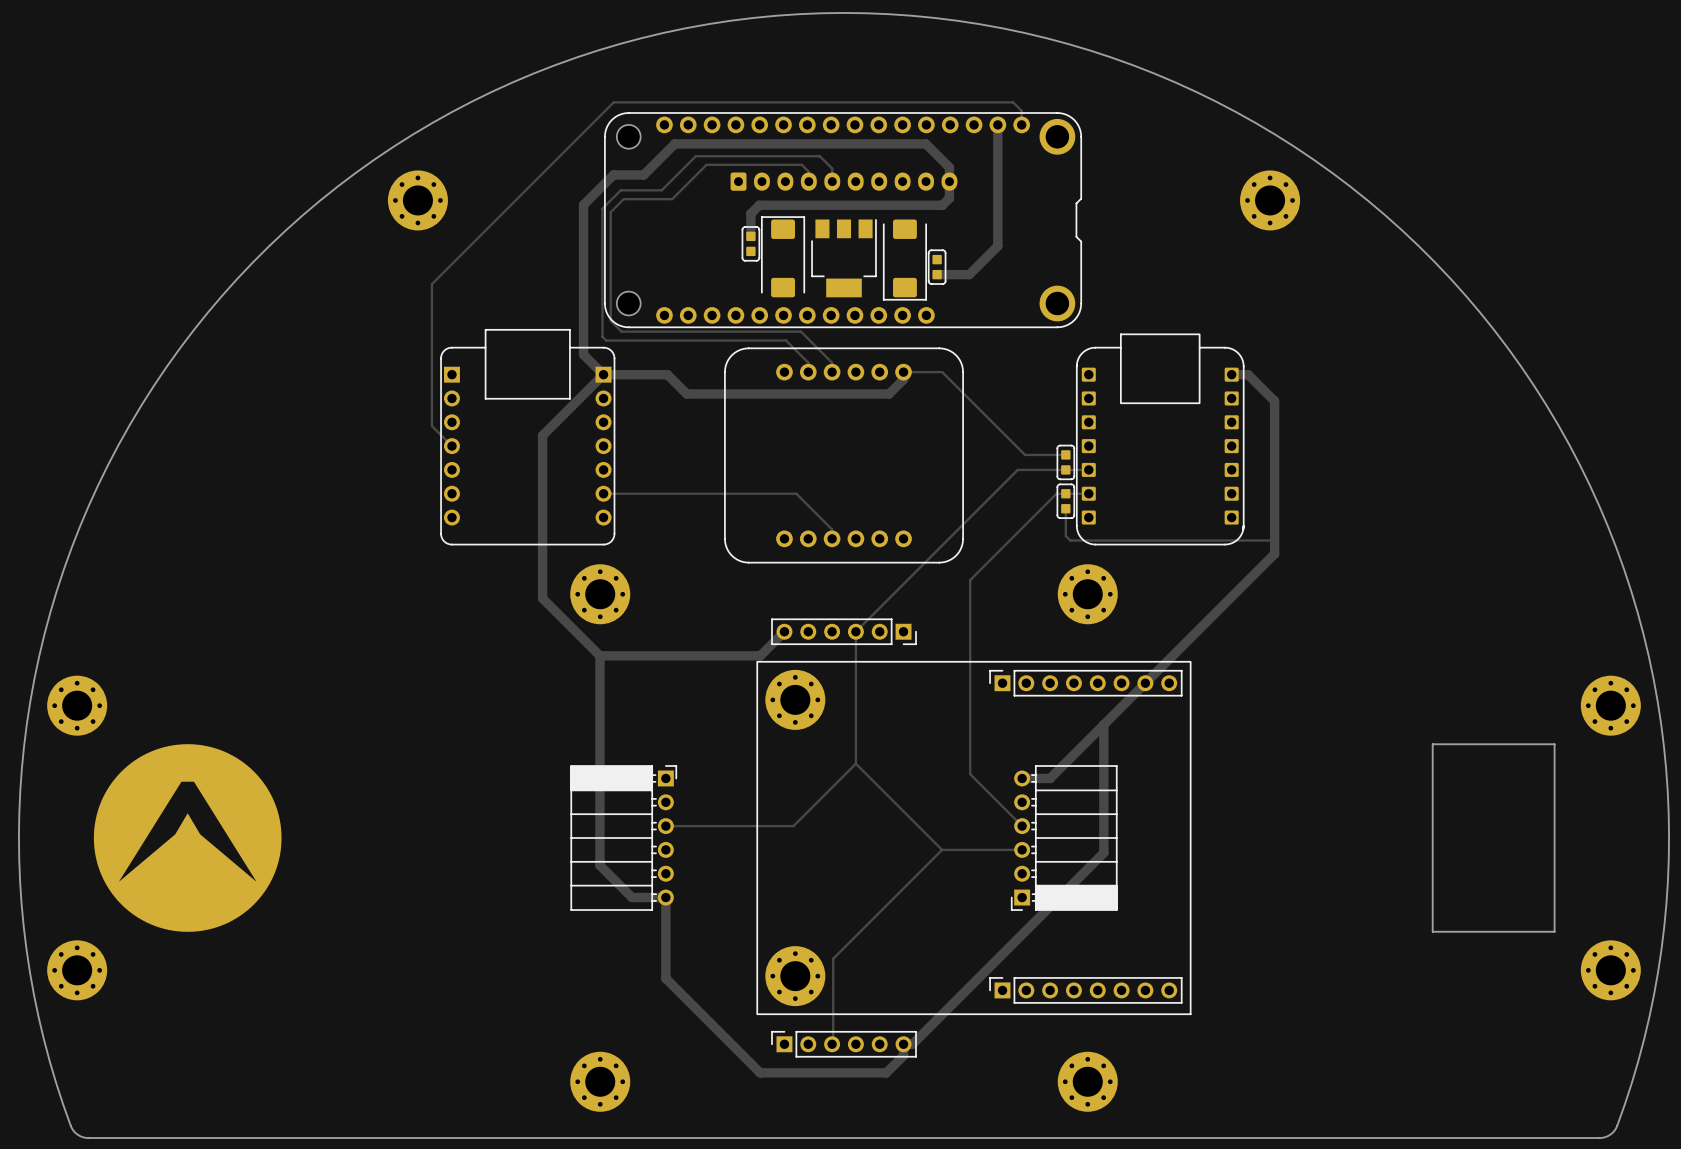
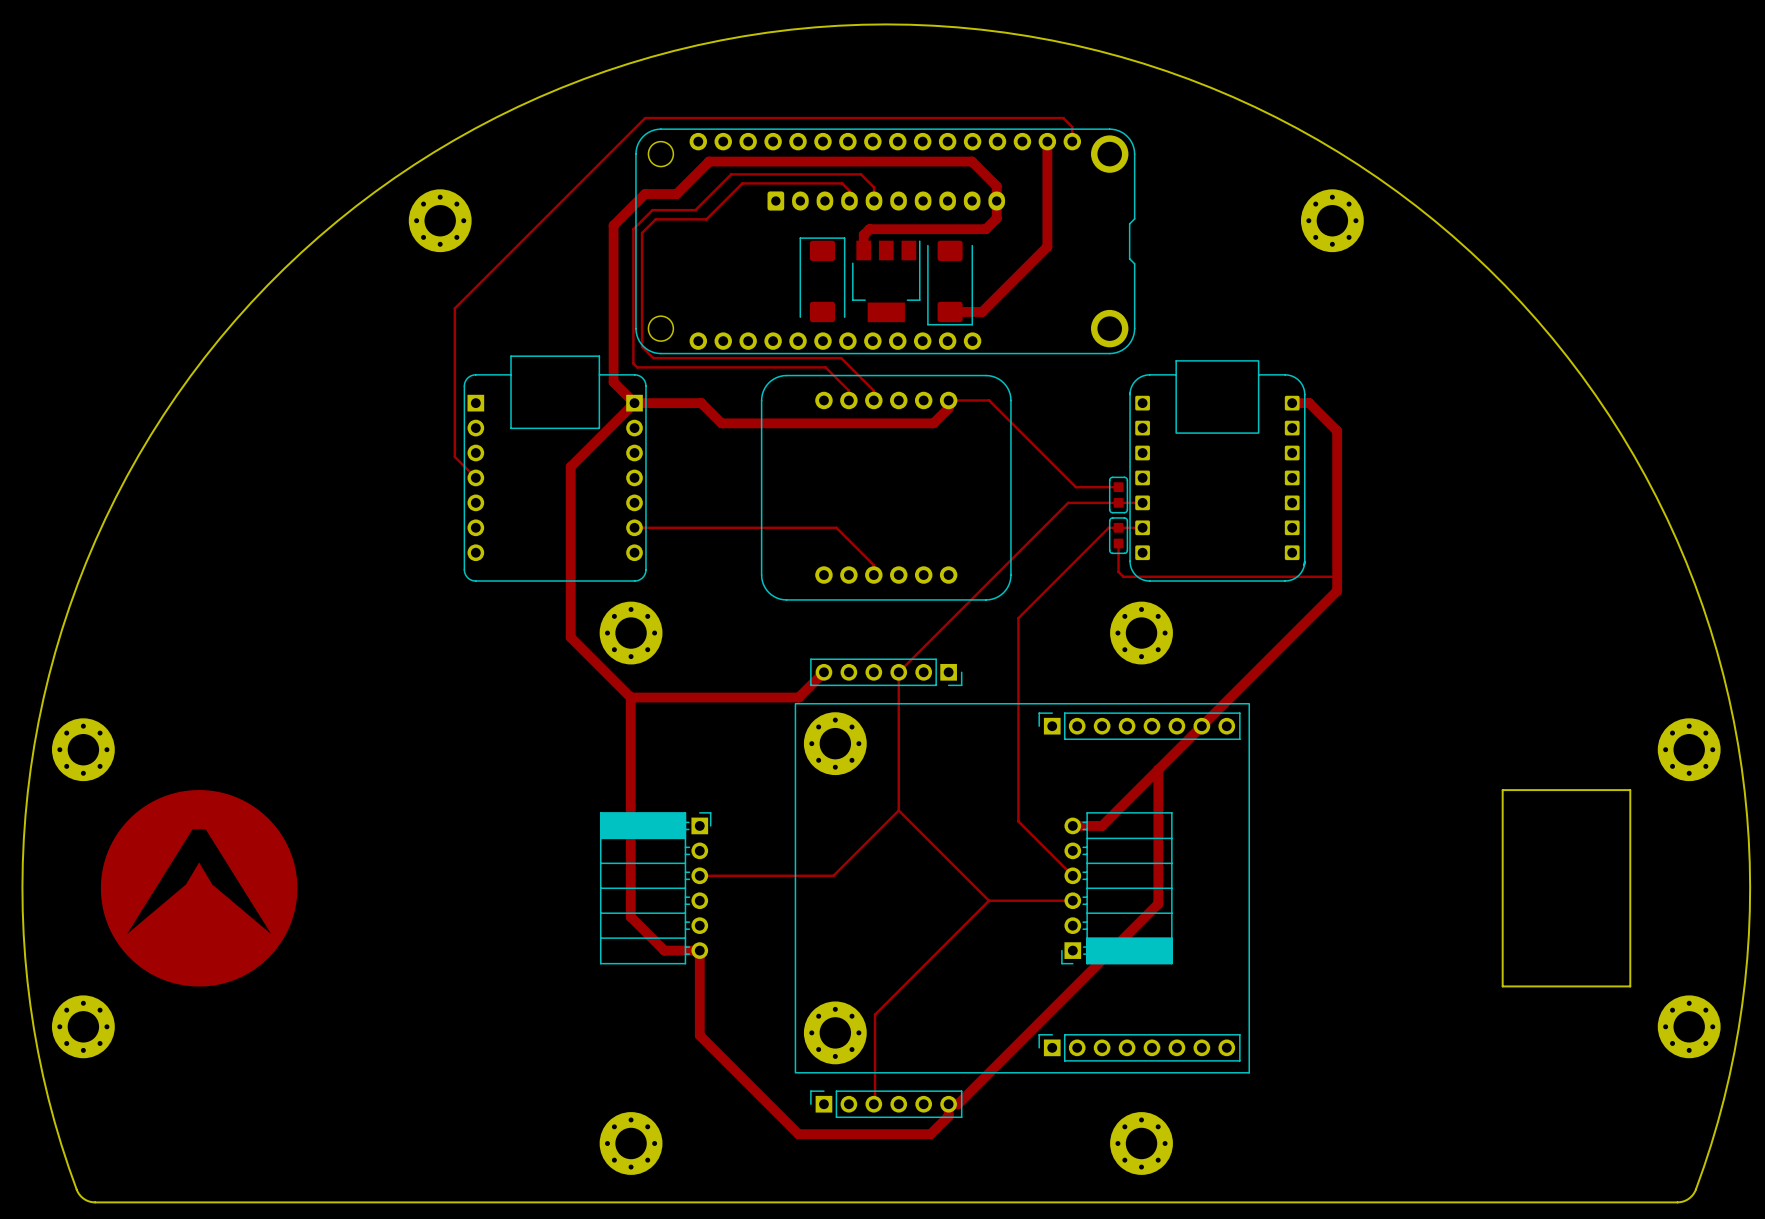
track: (942, 205) (759, 205) (750, 213) (750, 236) -> (989, 225) (985, 229) (869, 229) (863, 234) (863, 250)
track: (997, 225) (997, 246) (969, 274) (937, 274) -> (1047, 246) (982, 311) (950, 311)
part: (750, 243) -> none
part: (937, 267) -> none

